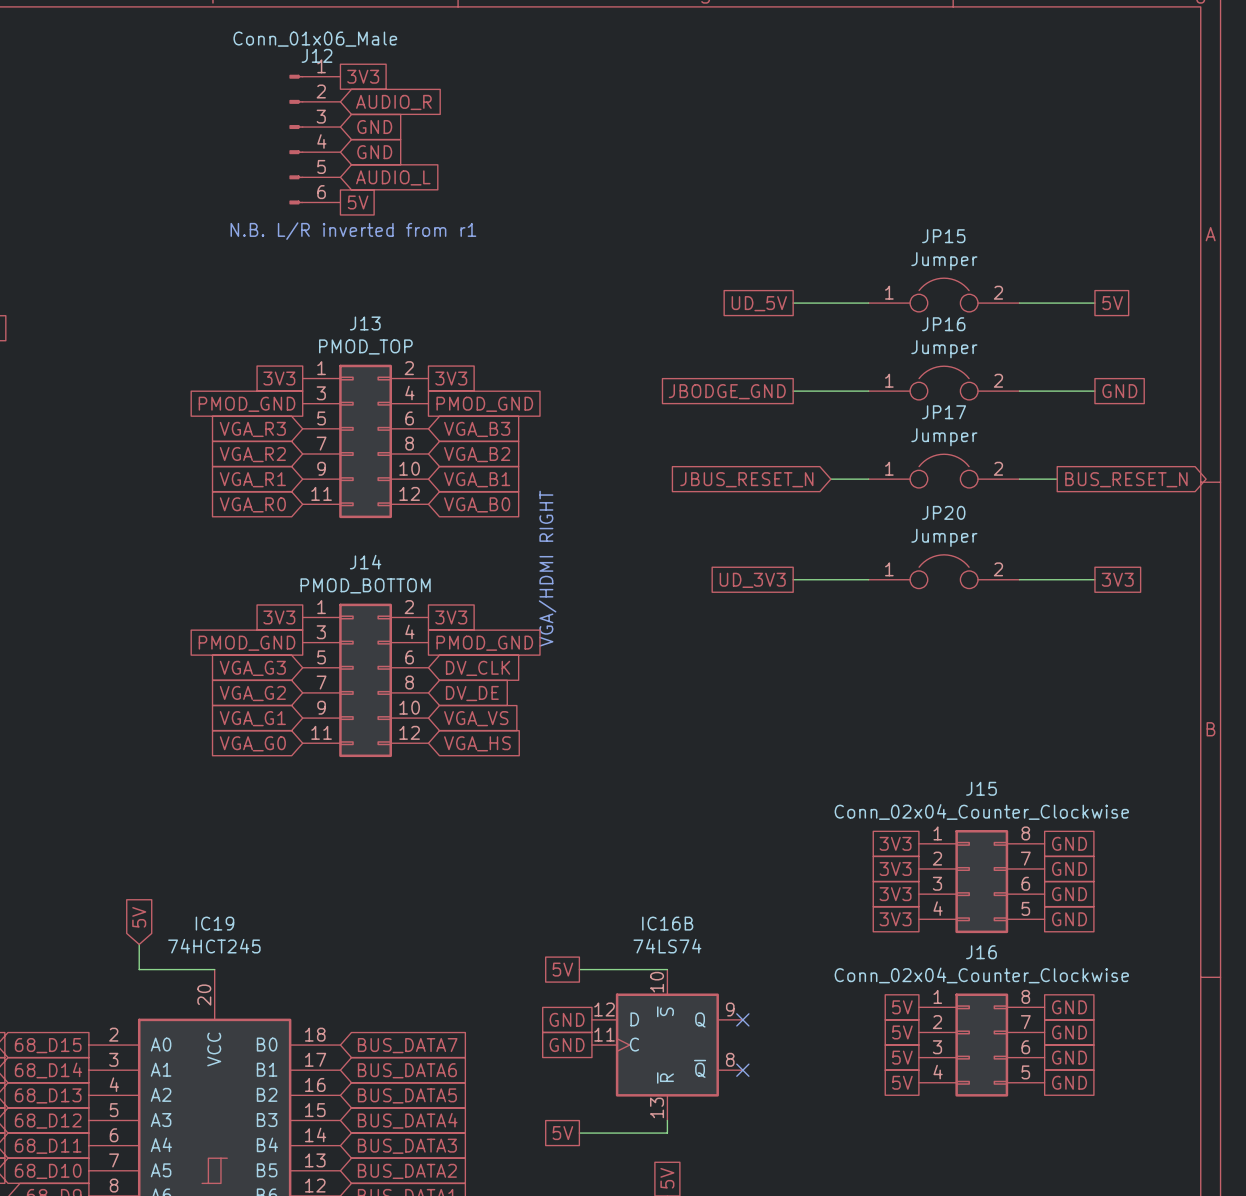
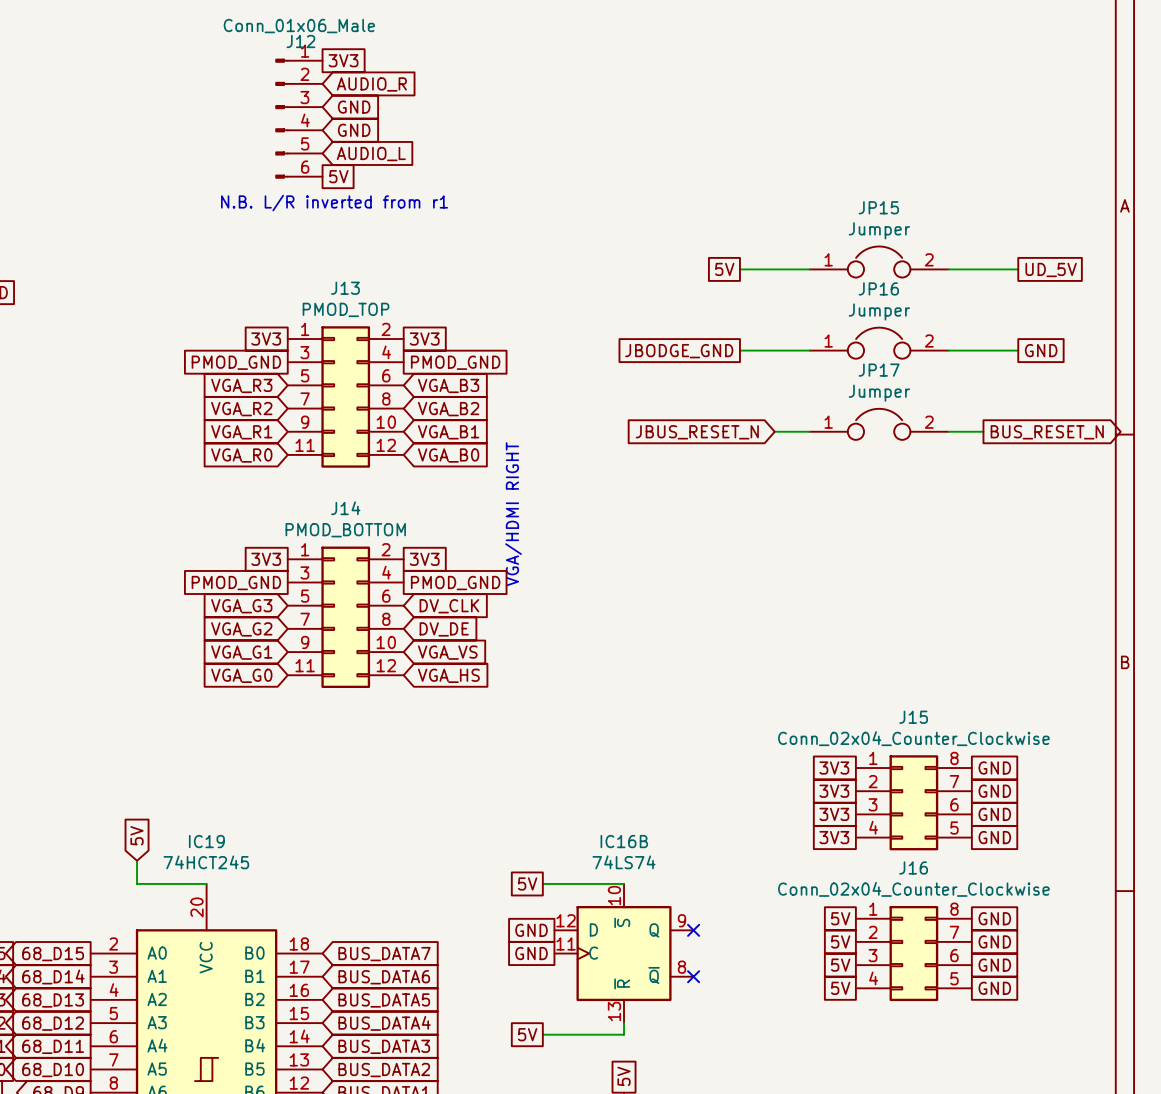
global label: UD_5V (759, 303) -> 5V (724, 269)
global label: 5V (1112, 303) -> UD_5V (1051, 269)
JP20: Jumper (944, 571) -> none
wire: (793, 579) (868, 579) -> none
wire: (1019, 579) (1094, 579) -> none
global label: 3V3 (1117, 579) -> none
global label: UD_3V3 (752, 580) -> none

